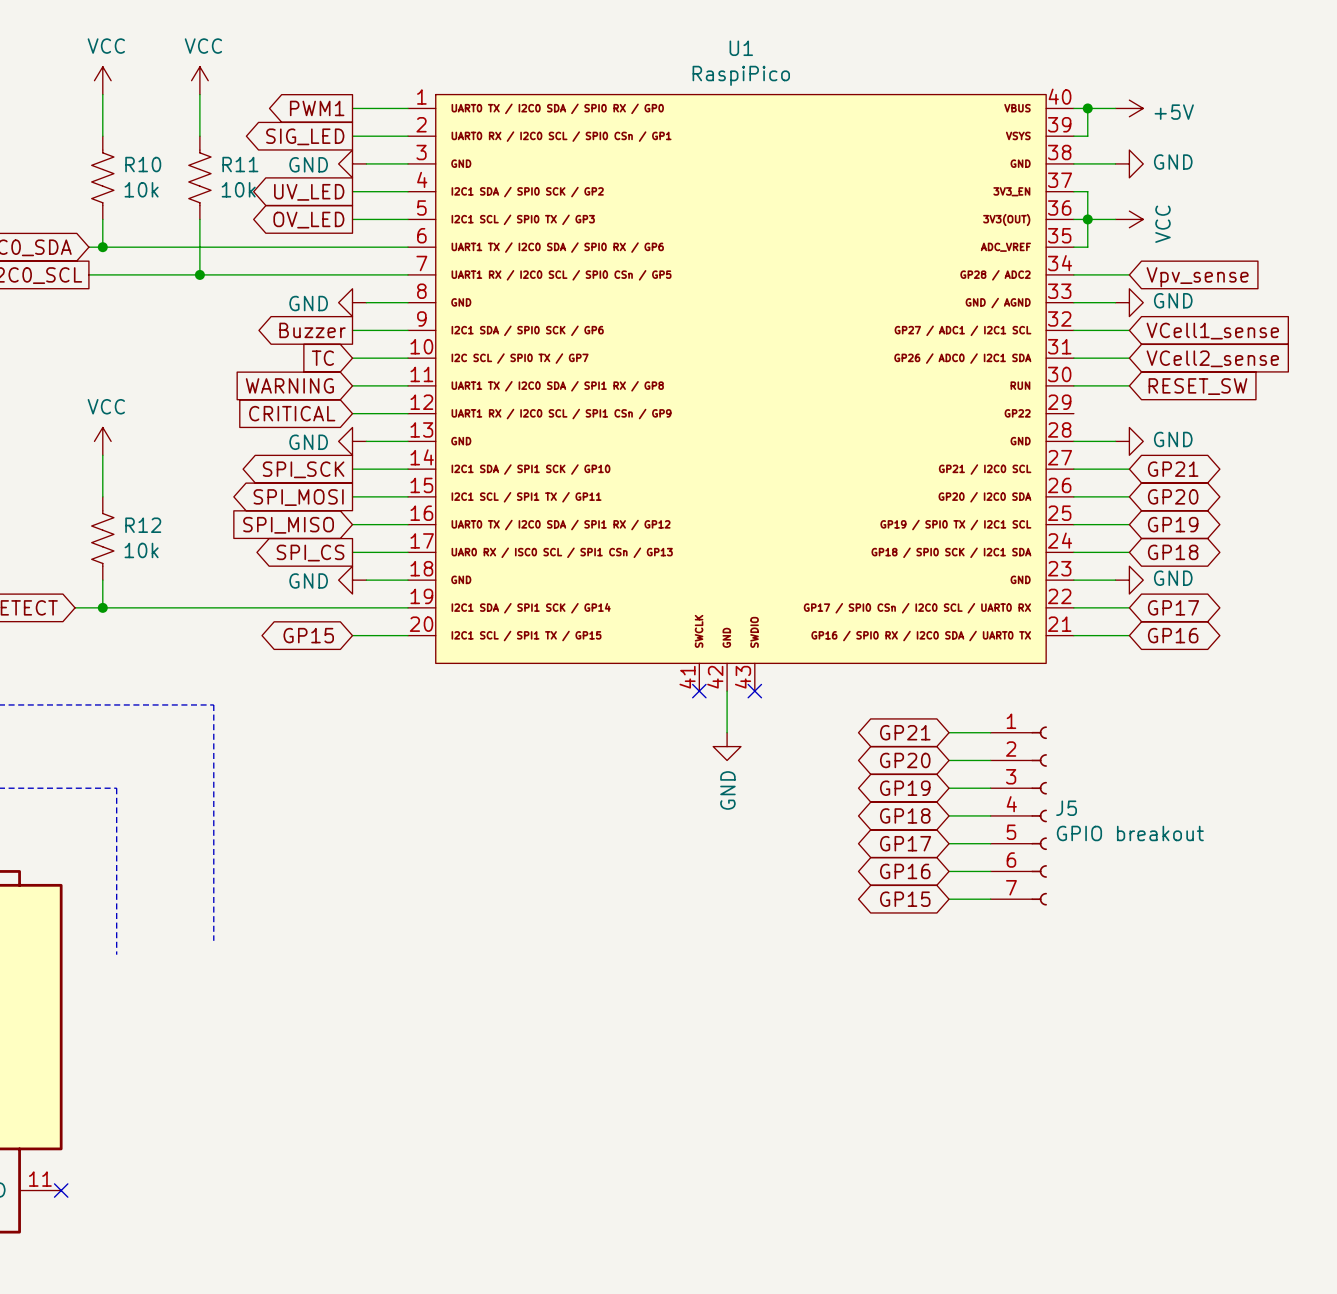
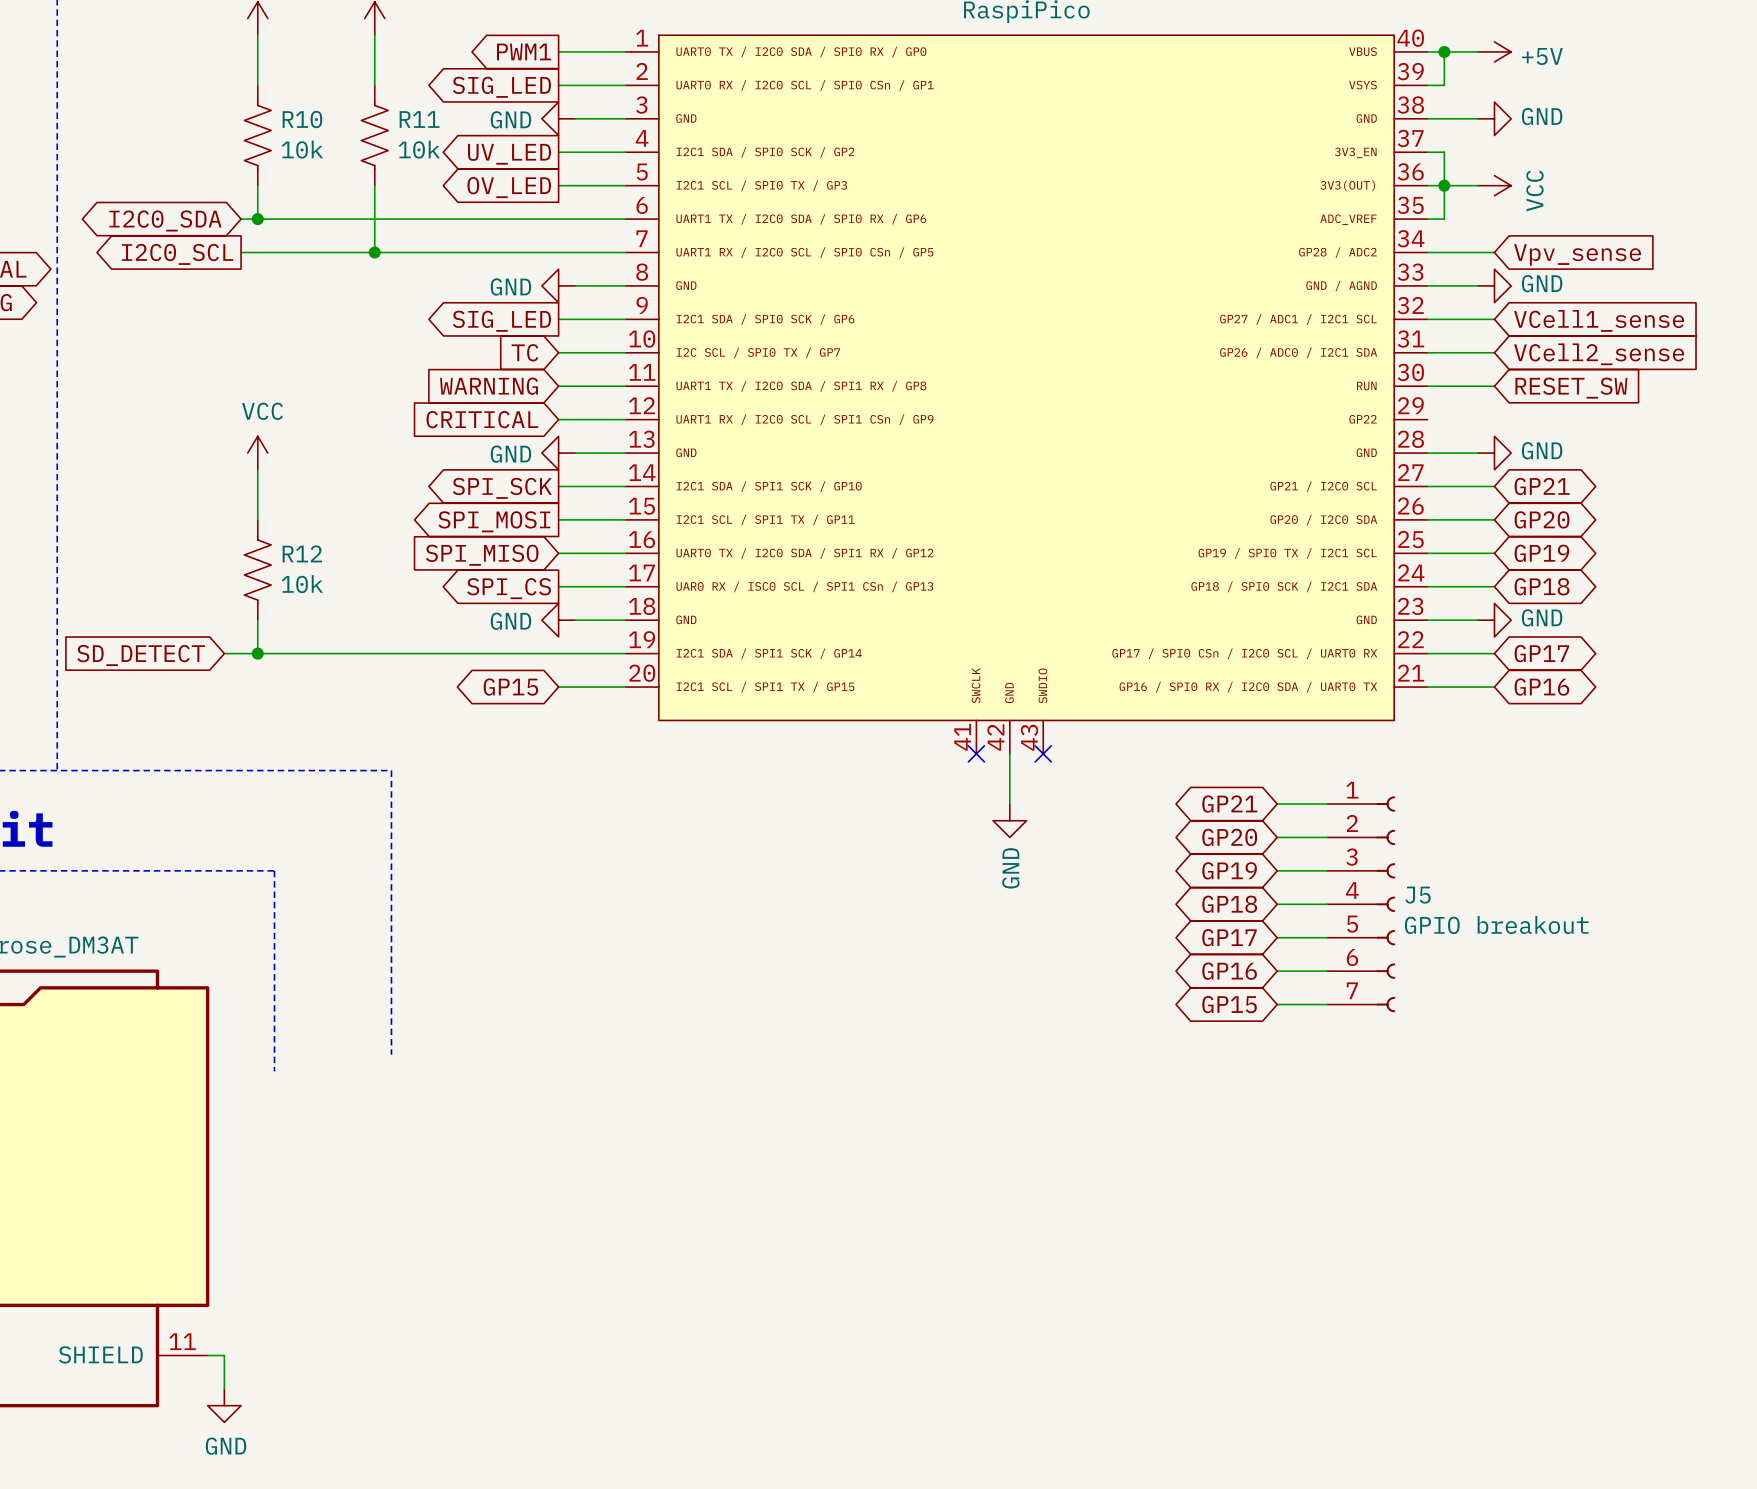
global label: Buzzer (312, 330) -> SIG_LED (501, 321)
wire: none -> (207, 1355) (224, 1355) (224, 1388)
no-connect mark: (61, 1190) -> none
power symbol: none -> GND (224, 1405)

